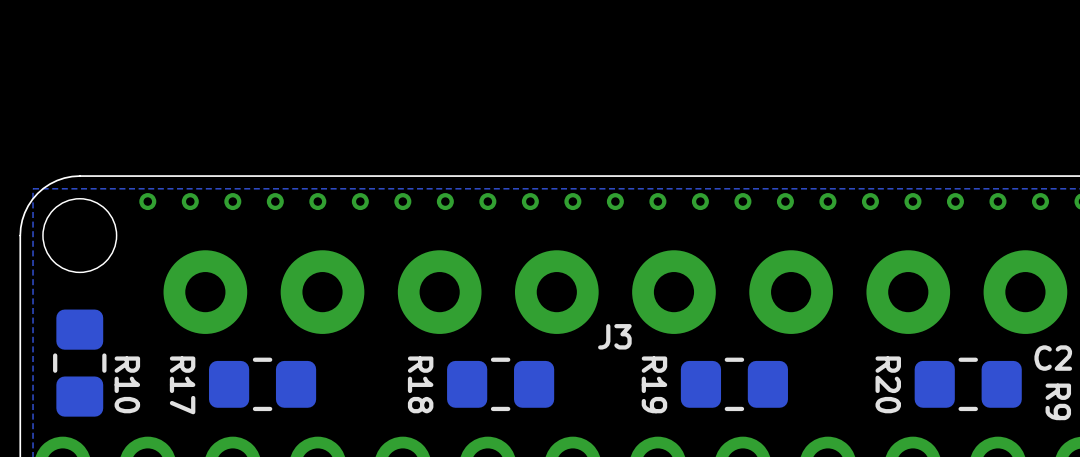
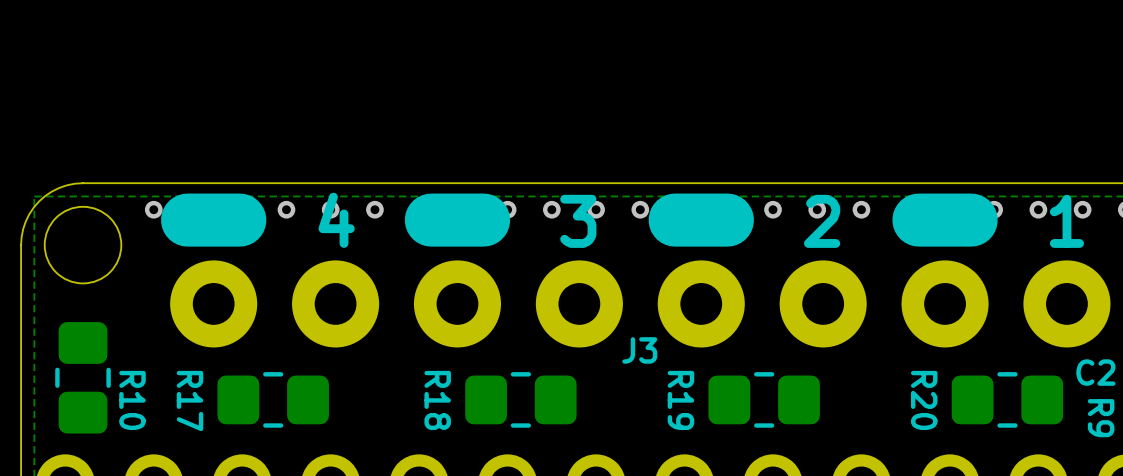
line: none -> (239, 220) (187, 220)
text: none -> 4 (336, 220)
line: none -> (483, 220) (431, 220)
line: none -> (727, 220) (675, 220)
line: none -> (971, 220) (918, 220)
text: none -> 3 (578, 221)
text: none -> 2 (822, 221)
text: none -> 1 (1066, 221)

